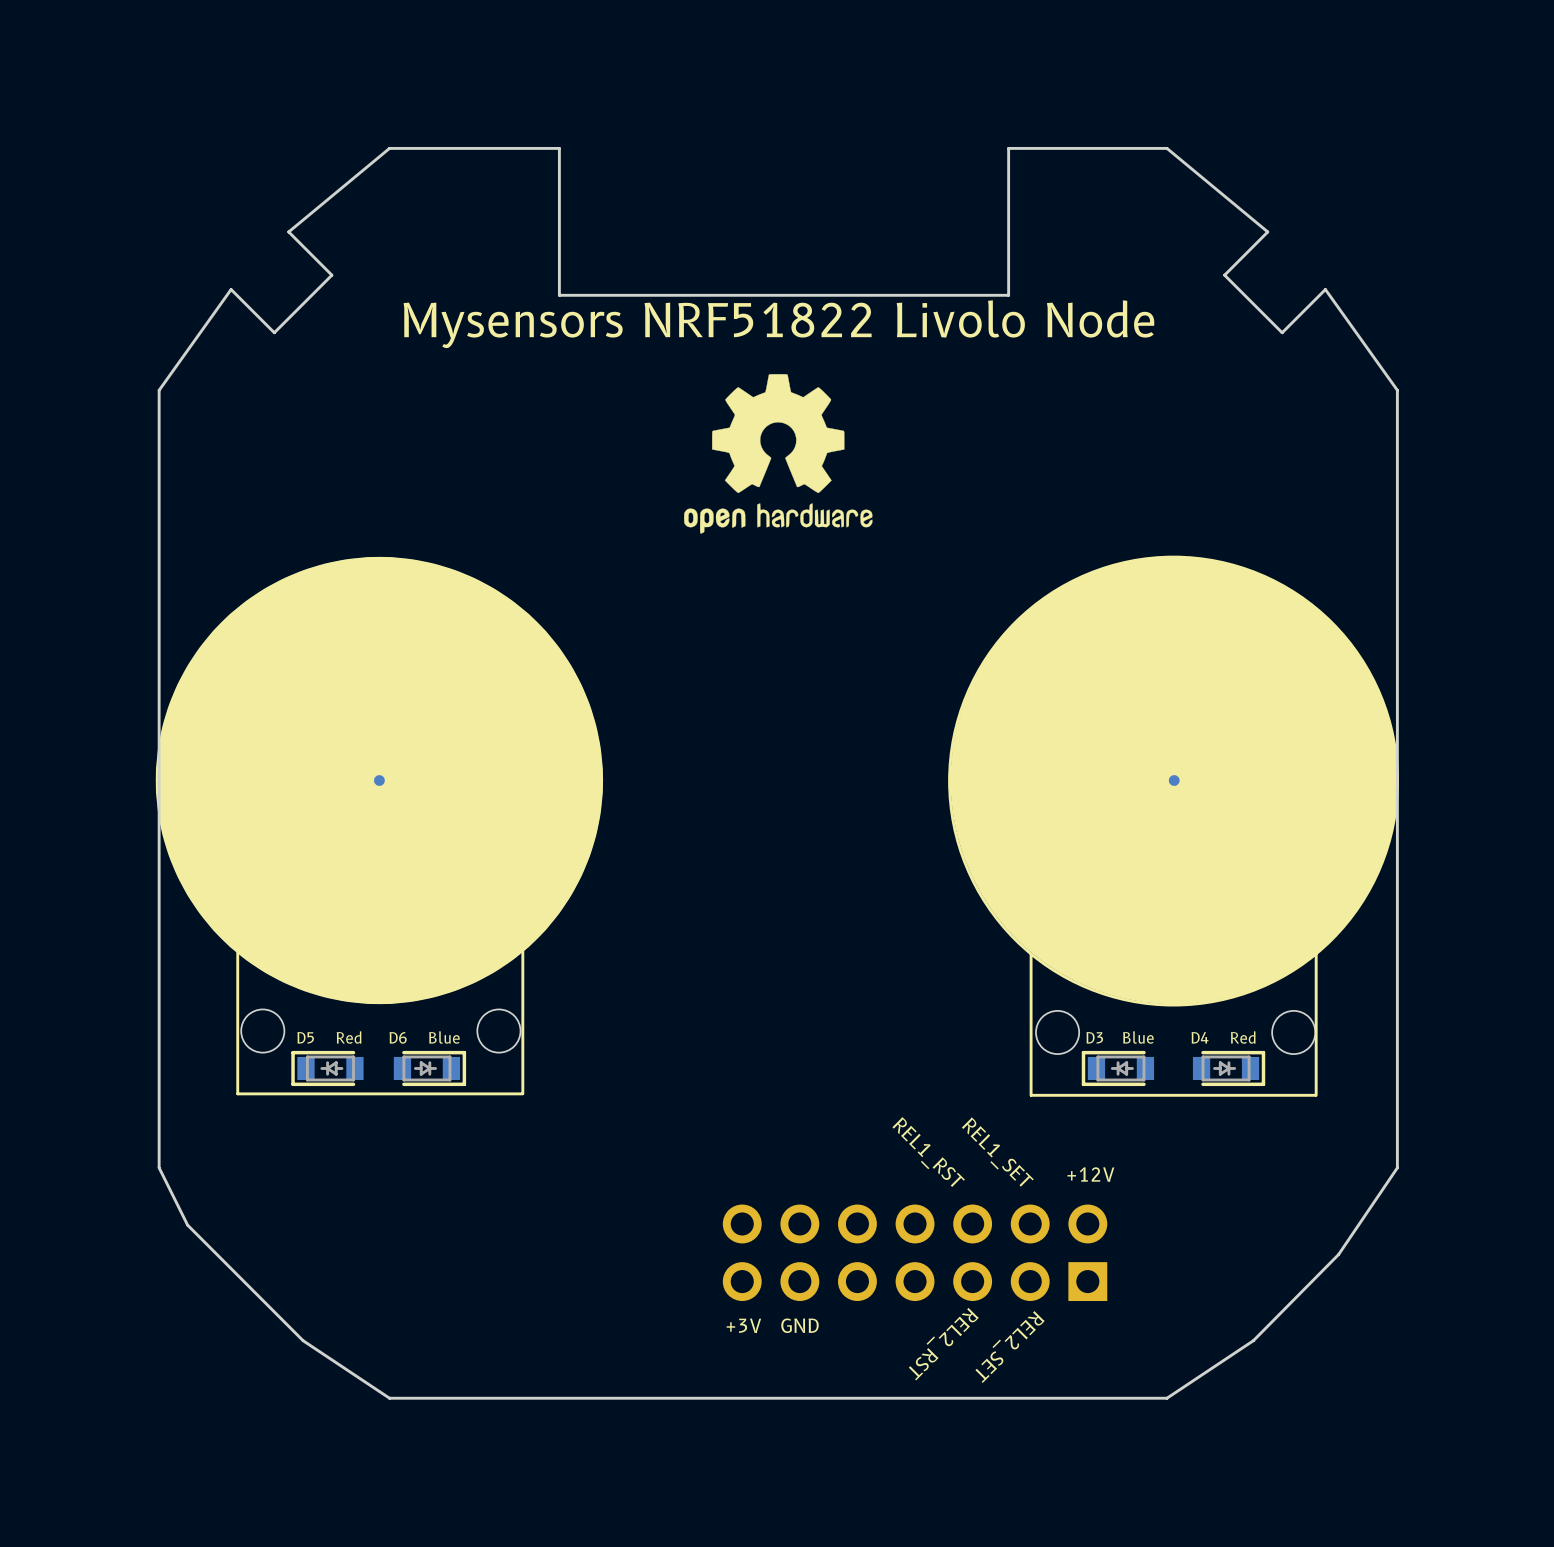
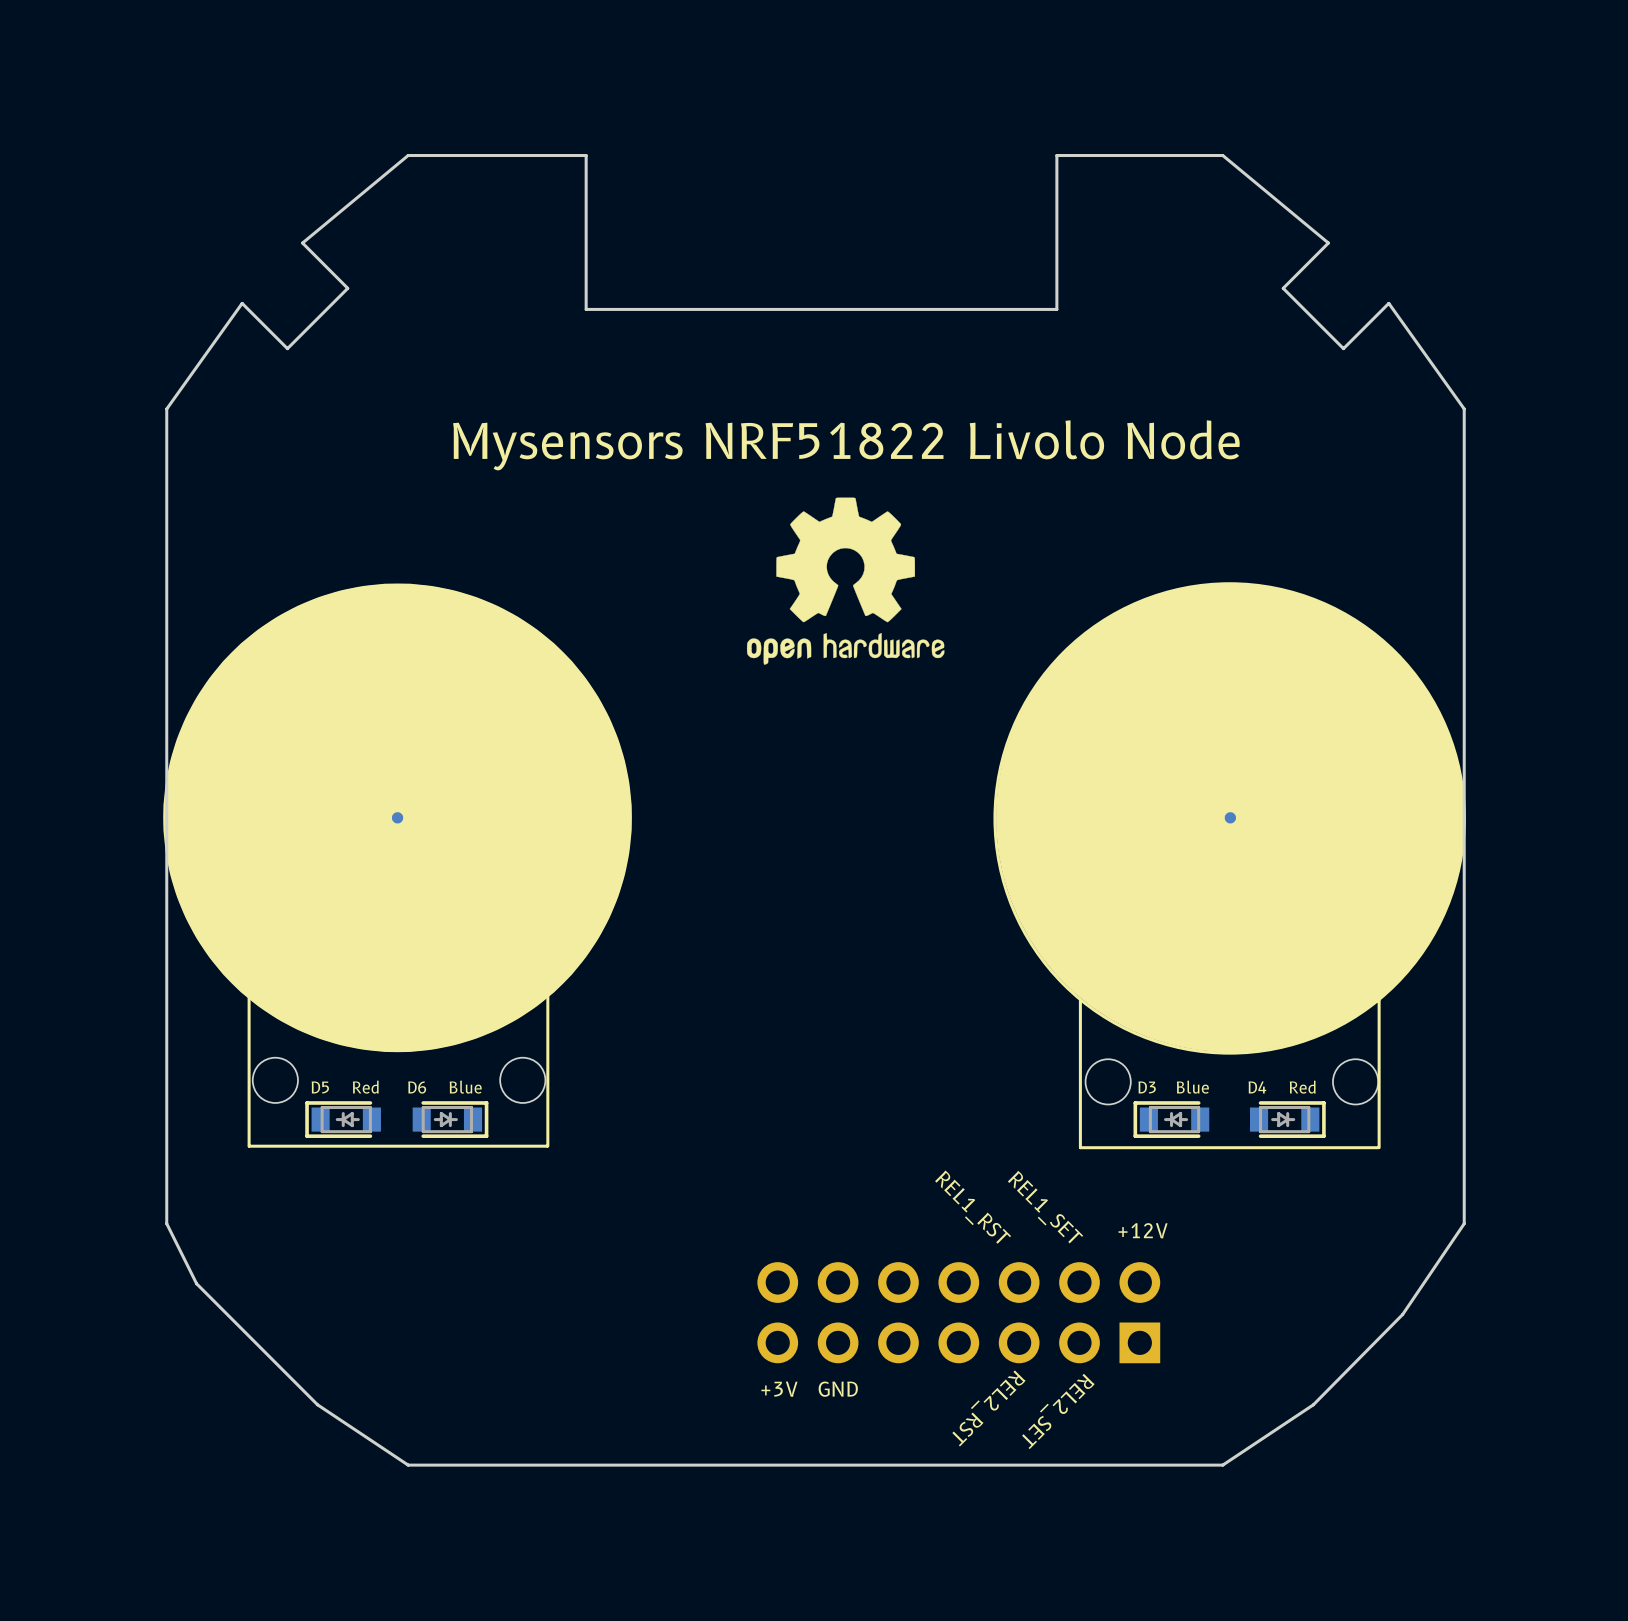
text position: Mysensors NRF51822 Livolo Node (778, 324) -> Mysensors NRF51822 Livolo Node (846, 445)
drawing position: (778, 453) -> (845, 581)

